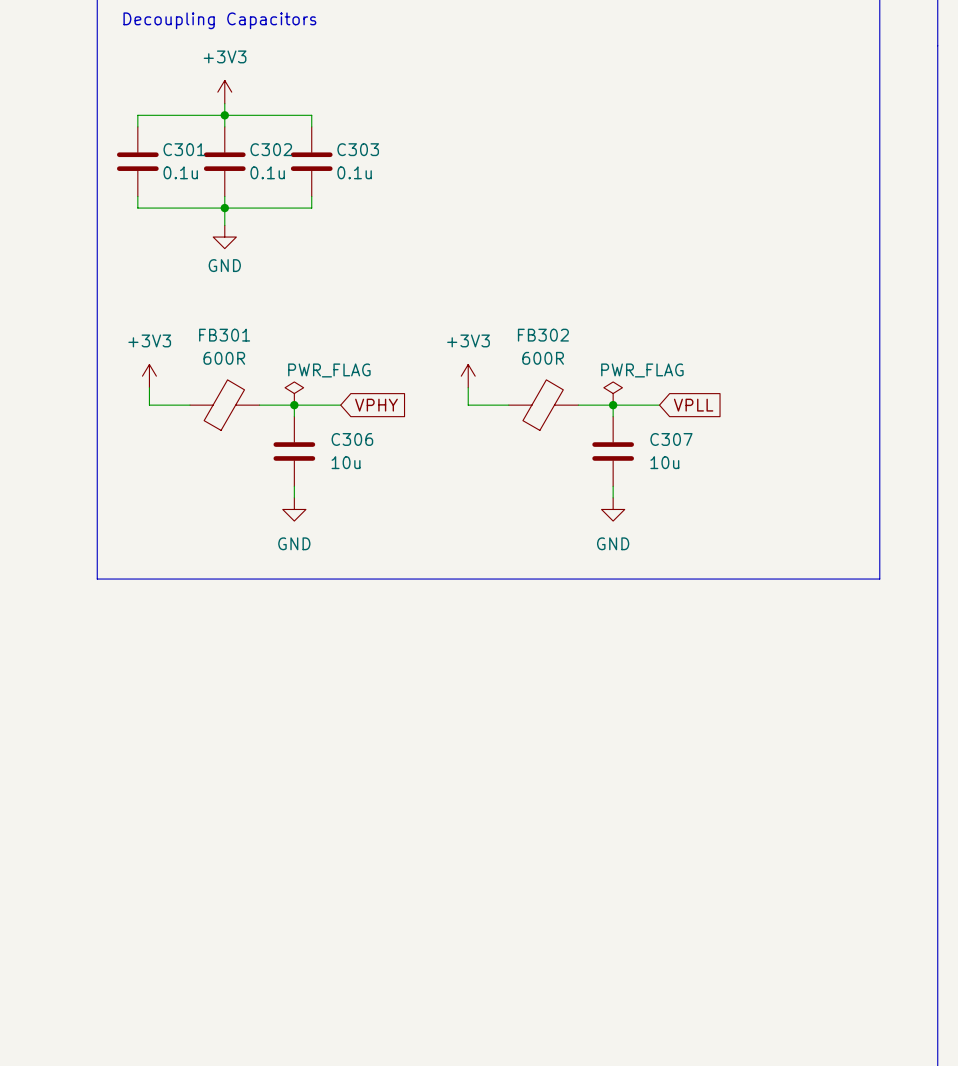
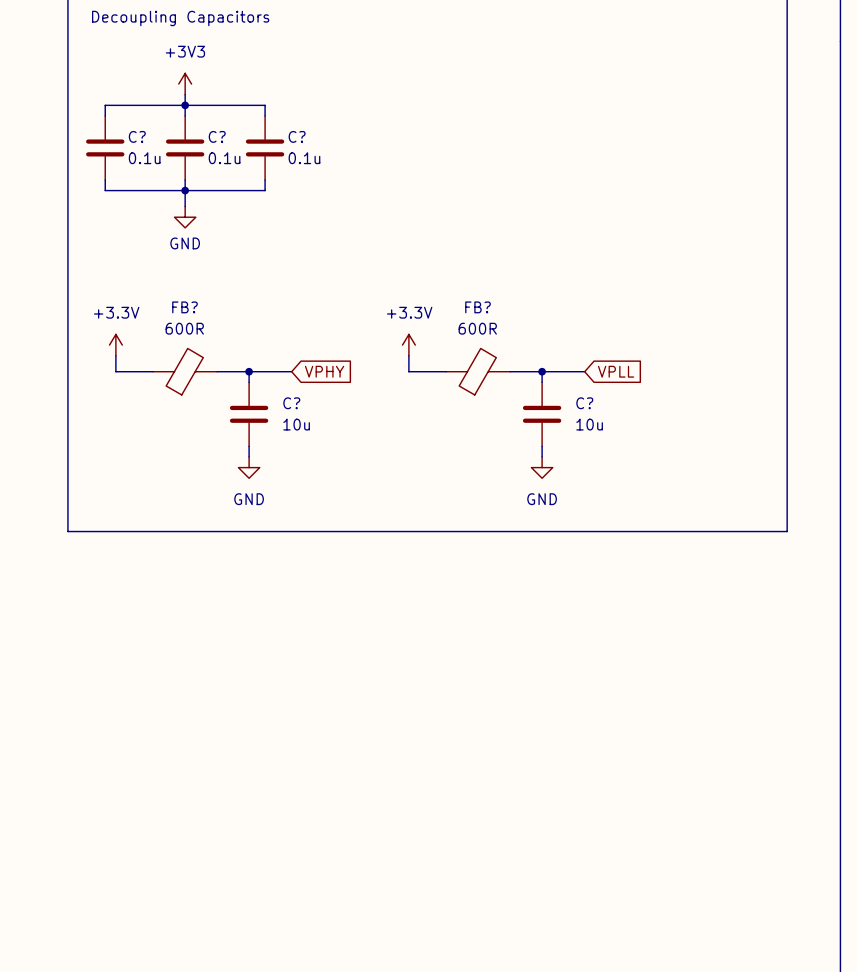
C301 name: C301 (184, 149) -> C? (137, 136)
C302 name: C302 (271, 149) -> C? (217, 136)
C303 name: C303 (358, 149) -> C? (297, 136)
FB301 name: FB301 (224, 335) -> FB? (184, 307)
FB302 name: FB302 (543, 335) -> FB? (477, 307)
power symbol: +3V3 (149, 376) -> +3.3V (115, 345)
power symbol: +3V3 (468, 376) -> +3.3V (408, 345)
power symbol: PWR_FLAG (294, 393) -> none
power symbol: PWR_FLAG (613, 393) -> none
C306 name: C306 (352, 439) -> C? (291, 403)
C307 name: C307 (671, 439) -> C? (584, 403)

